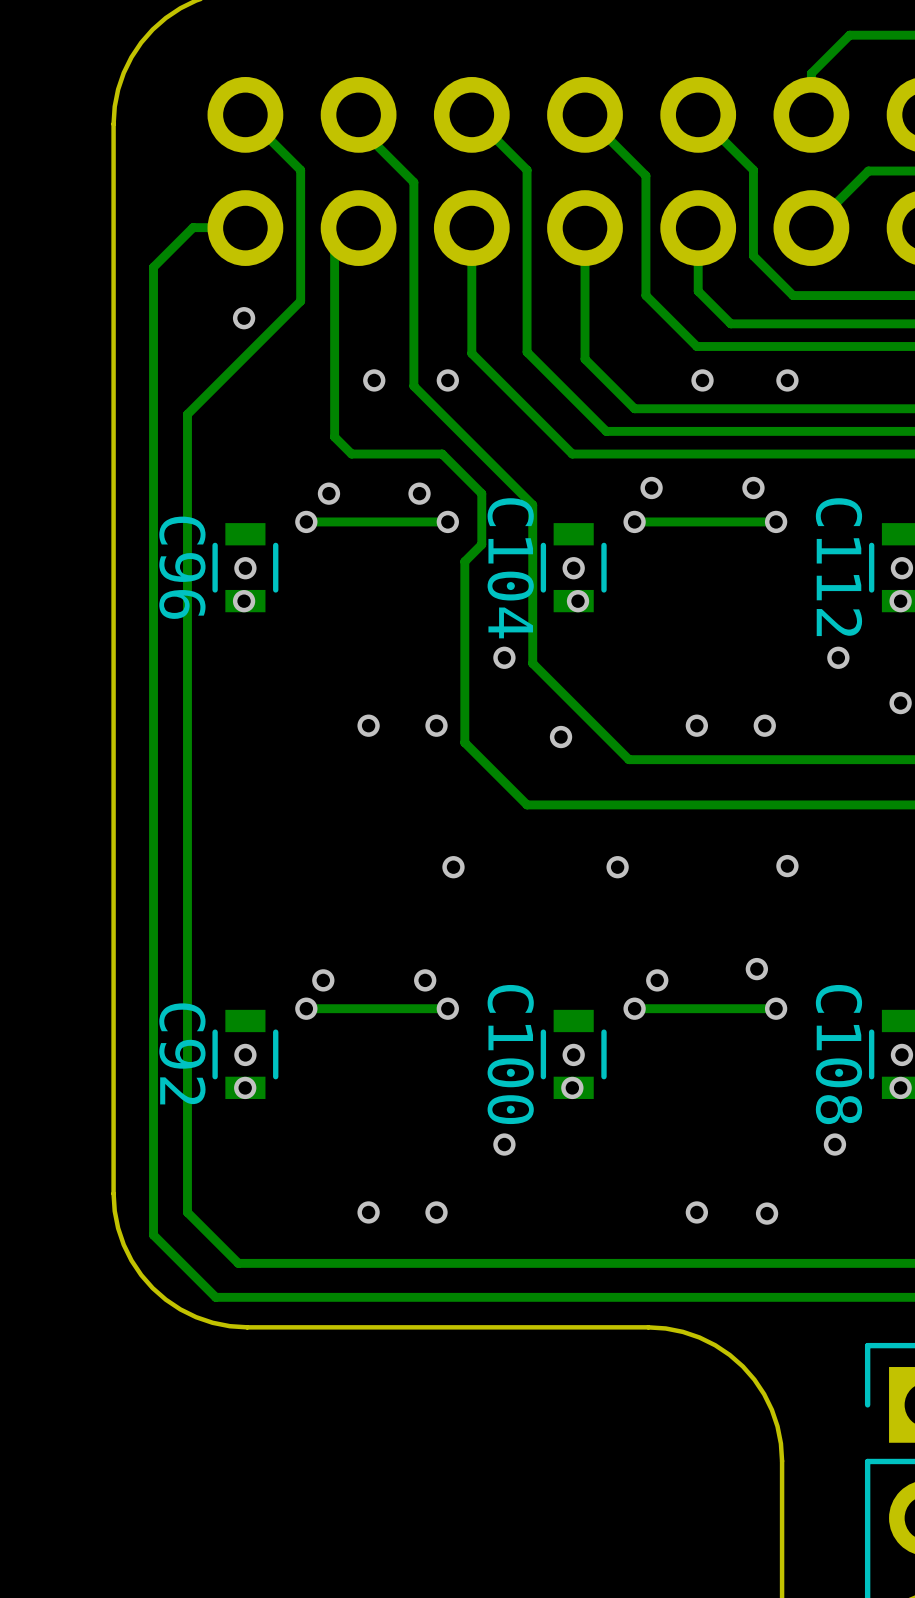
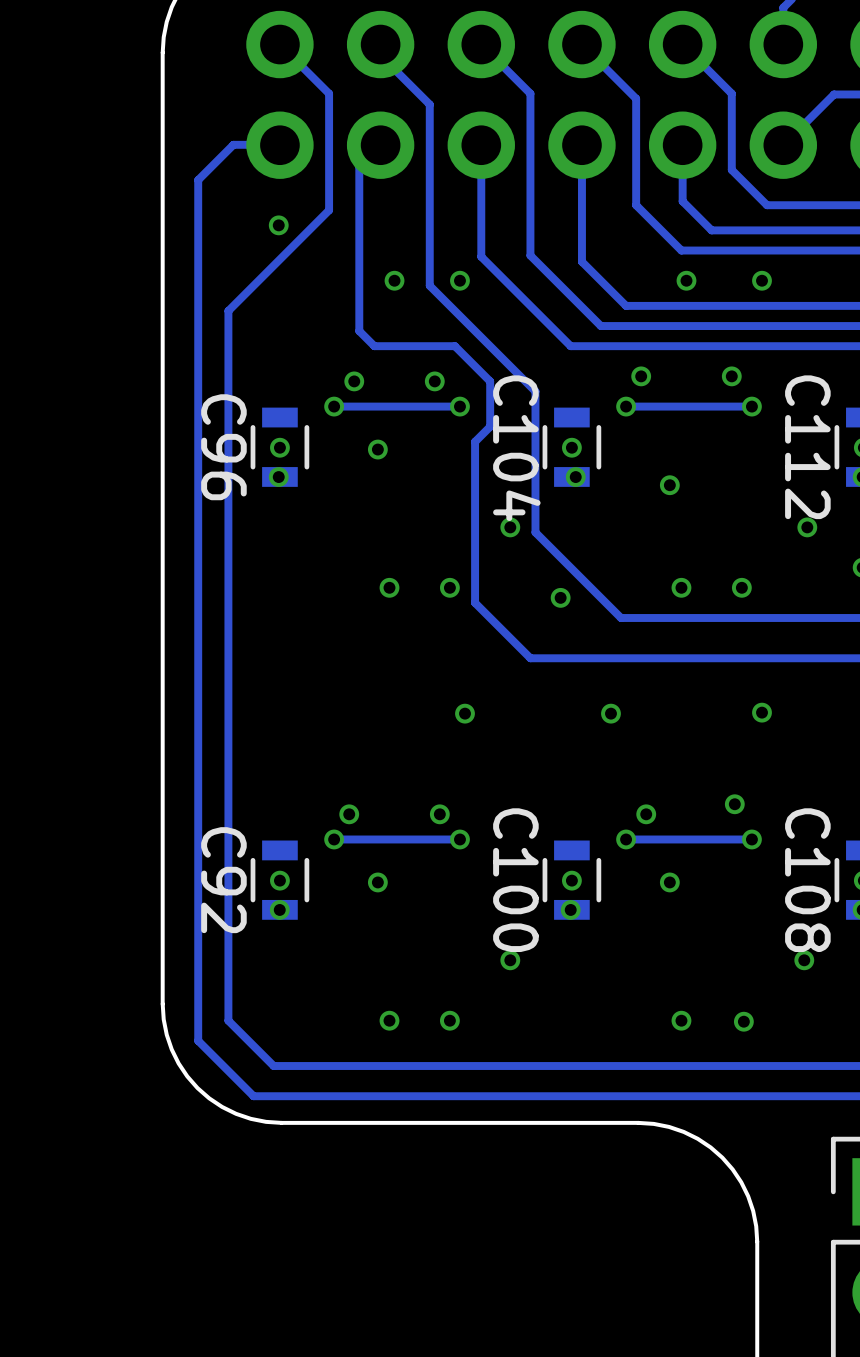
via: none -> (377, 449)
via: none -> (669, 485)
via: none -> (377, 882)
via: none -> (669, 882)

